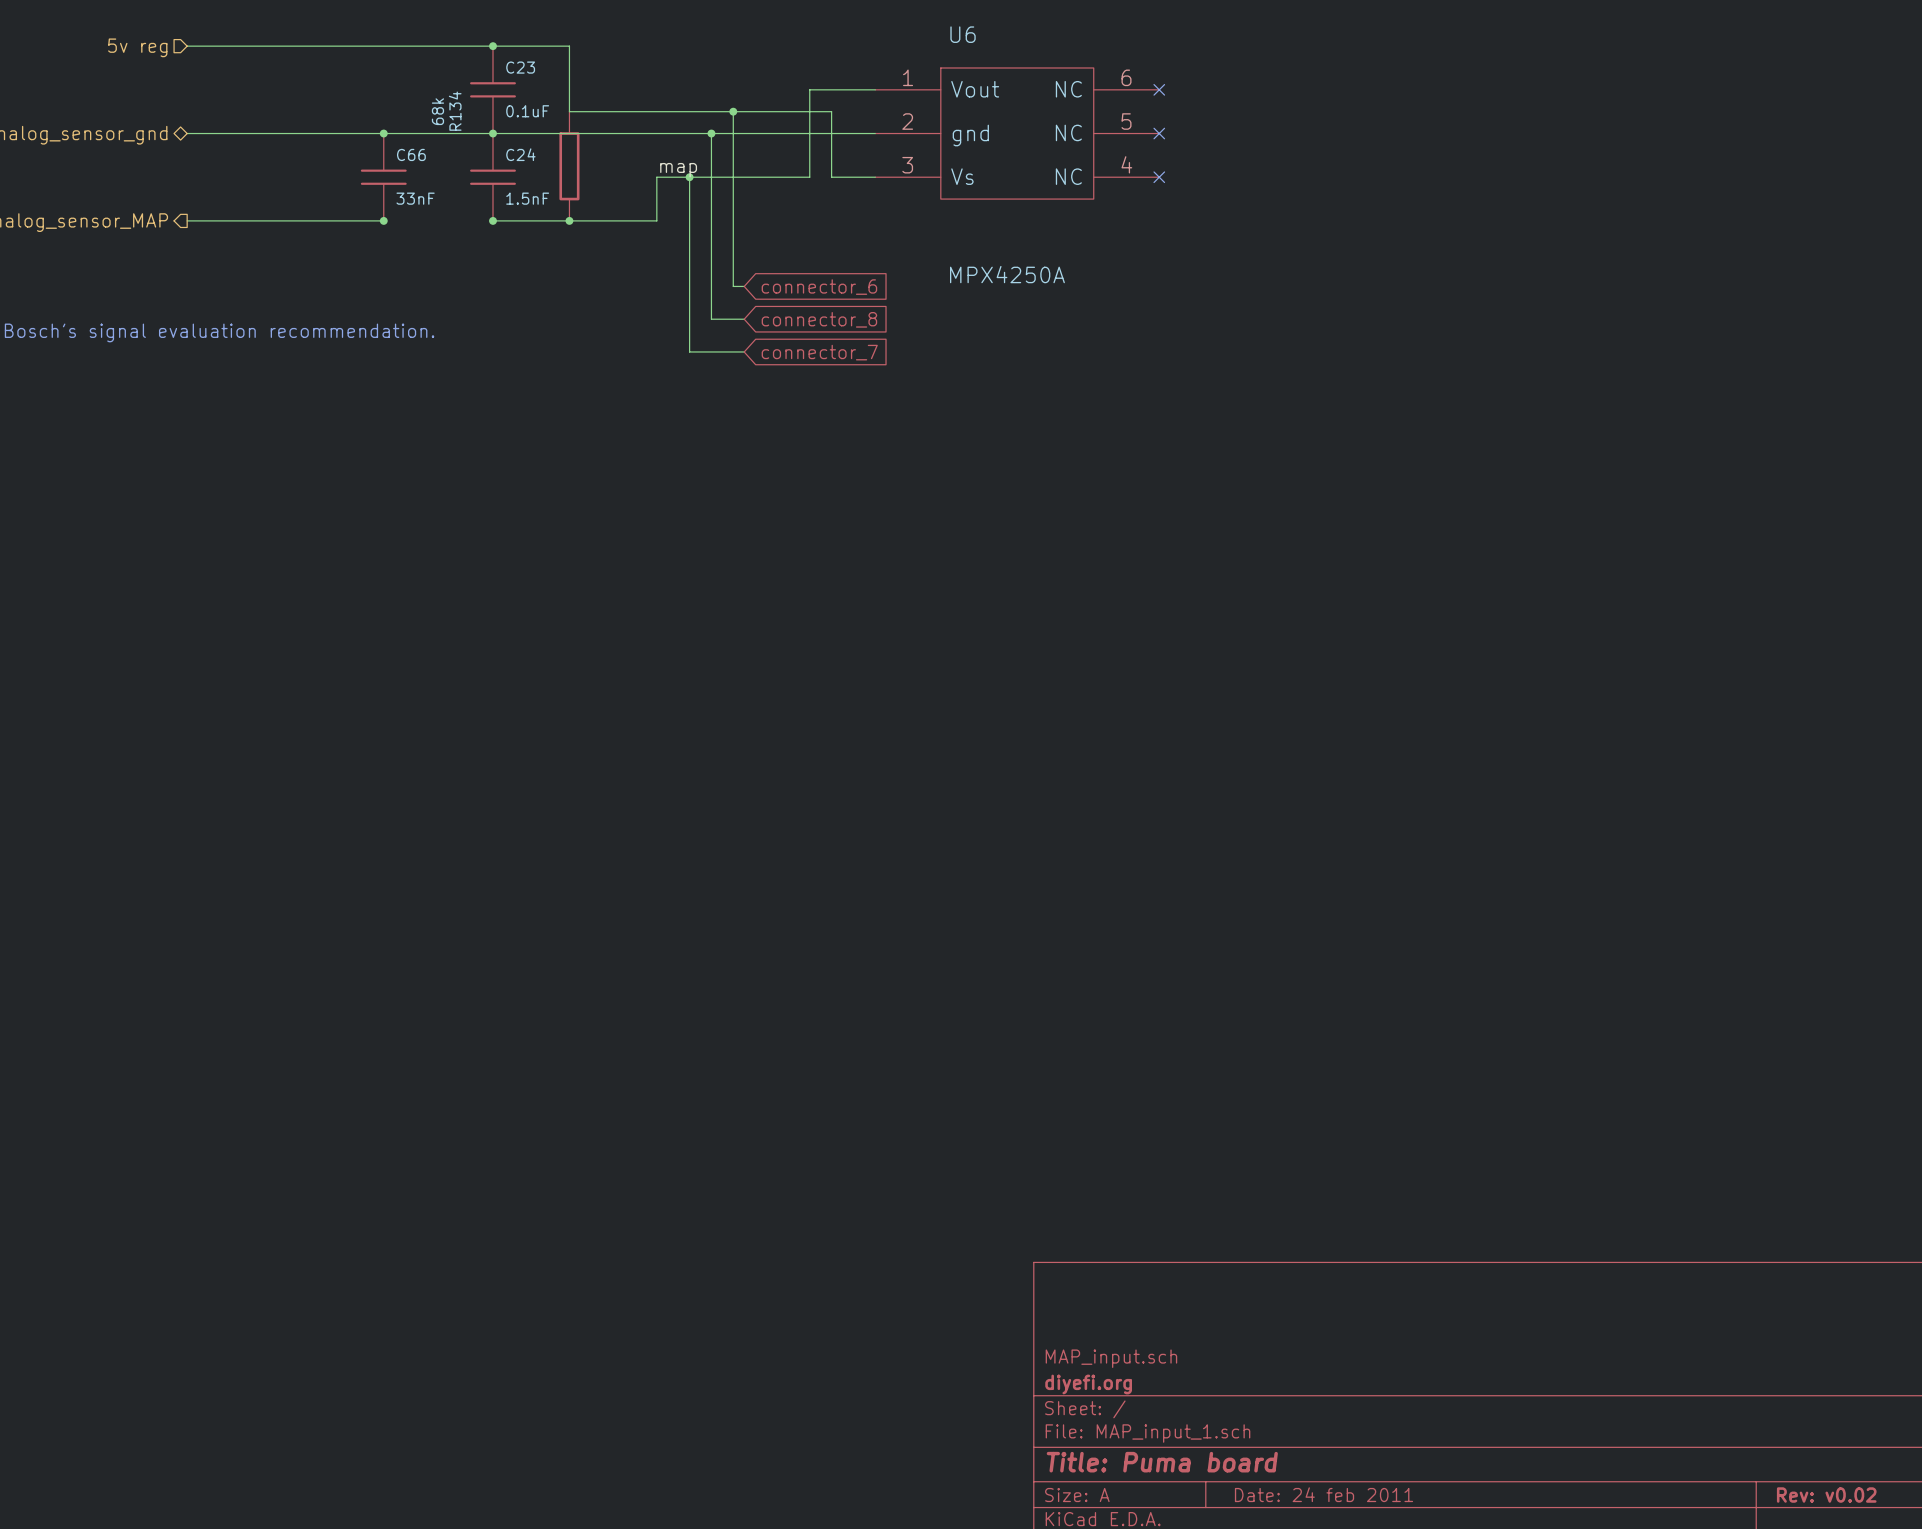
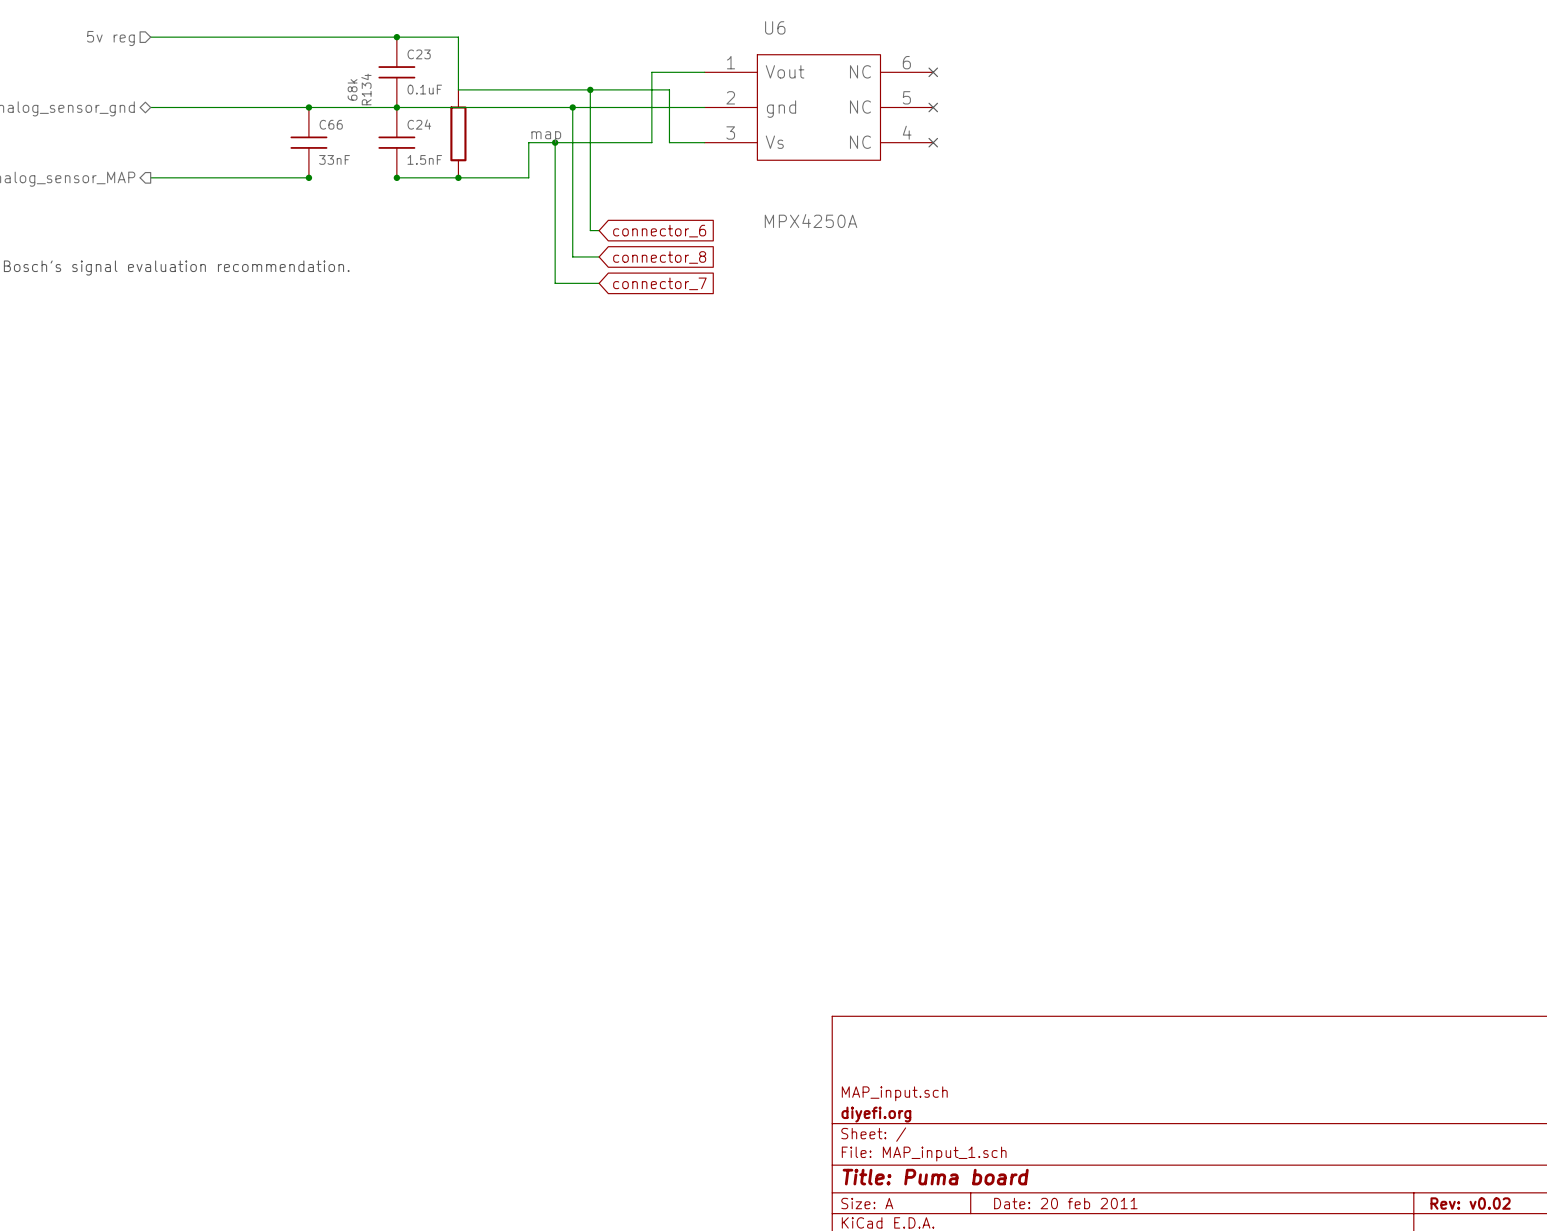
title block: Date: 24 feb 2011 (1324, 1494) -> Date: 20 feb 2011 (1065, 1203)

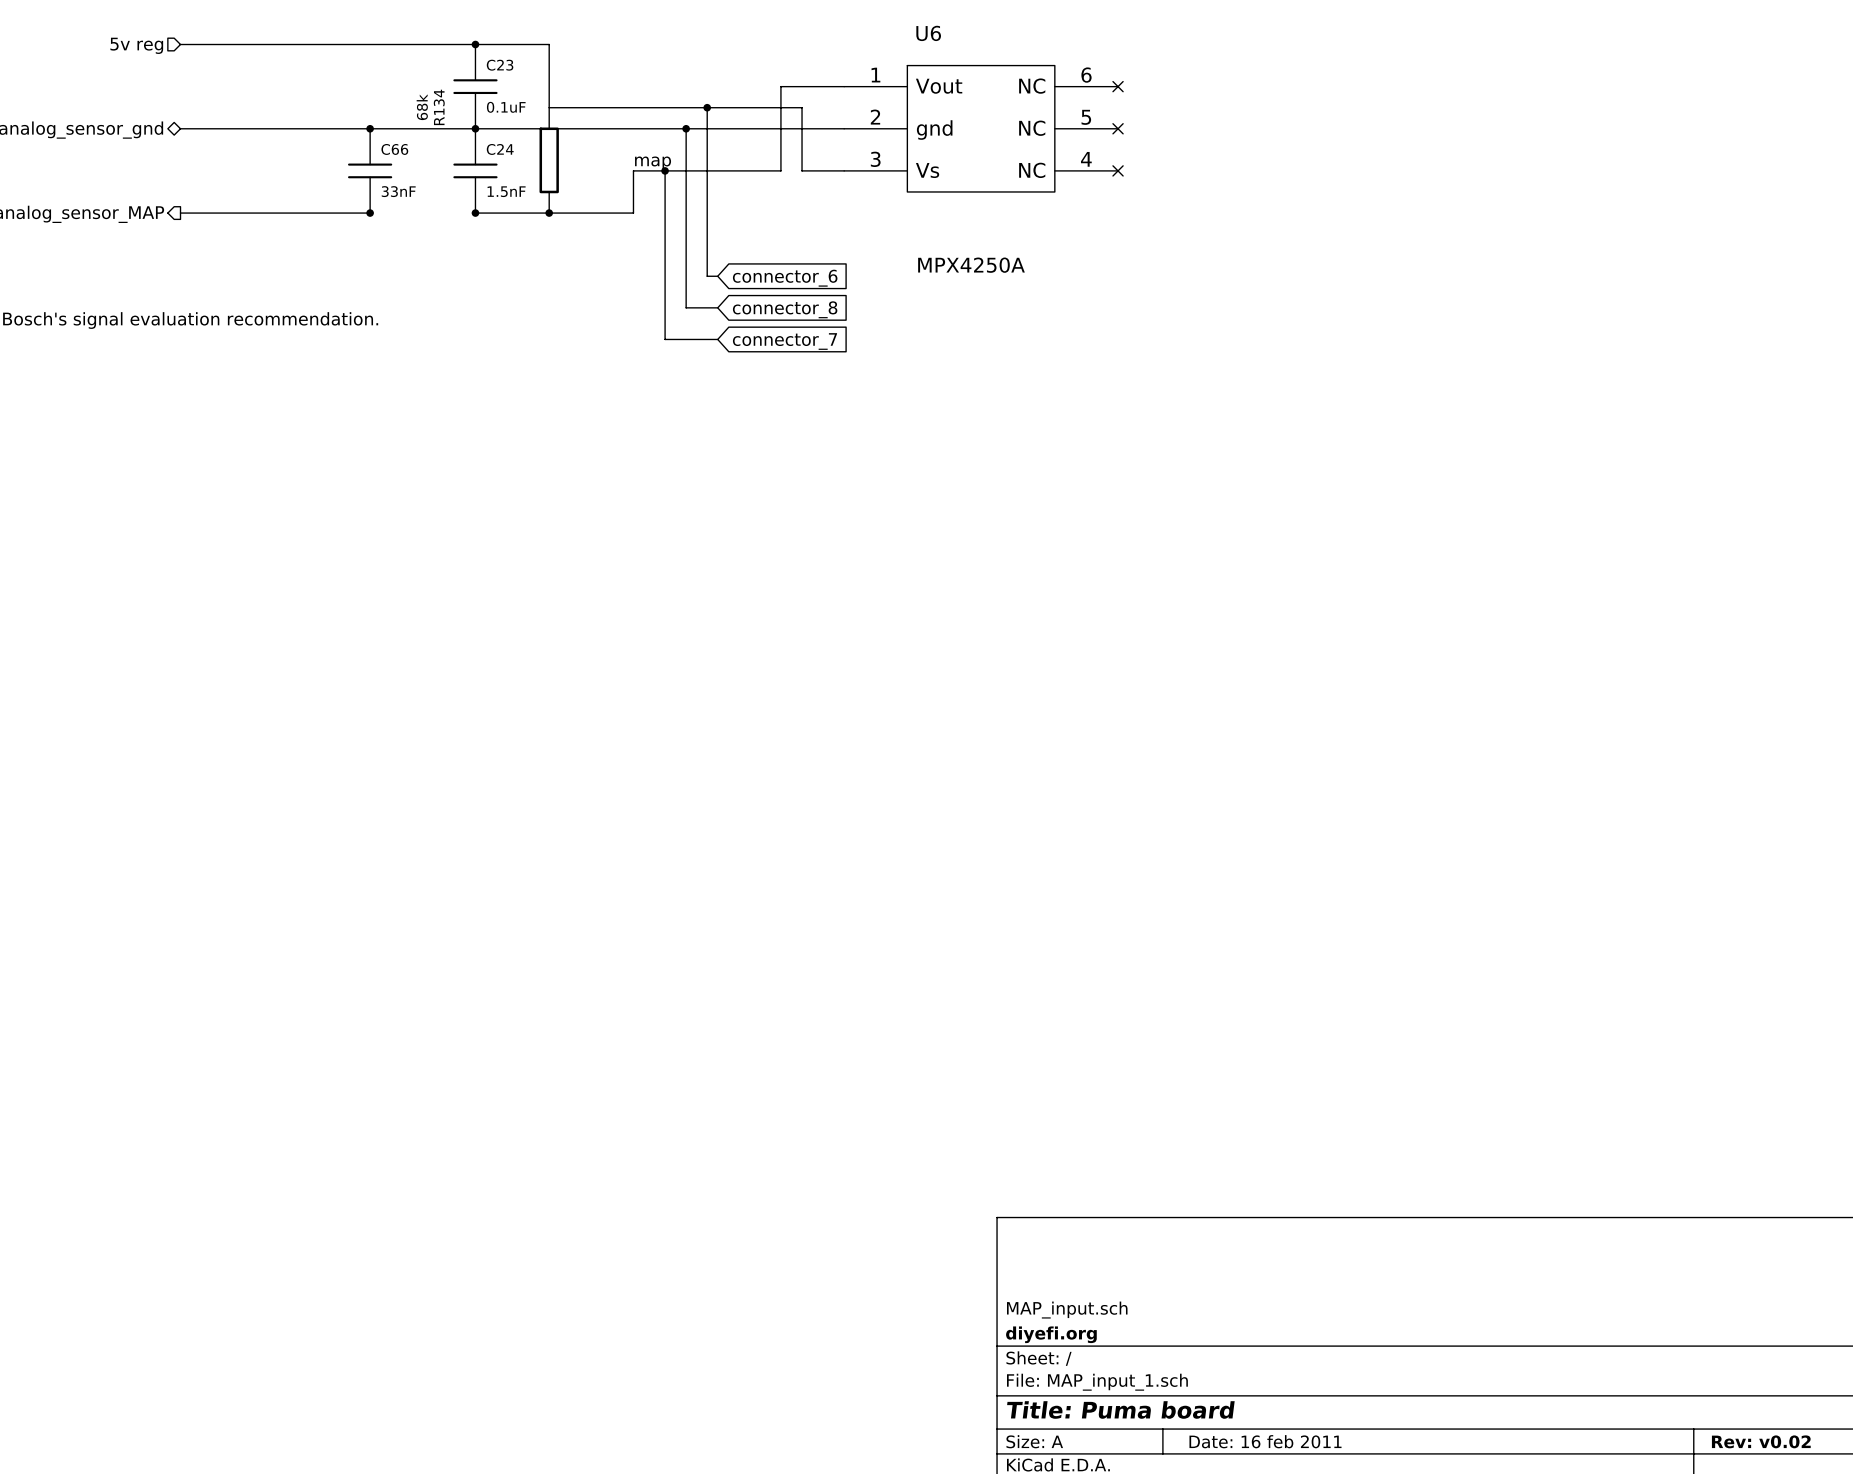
title block: Date: 20 feb 2011 (1065, 1203) -> Date: 16 feb 2011 (1265, 1441)

